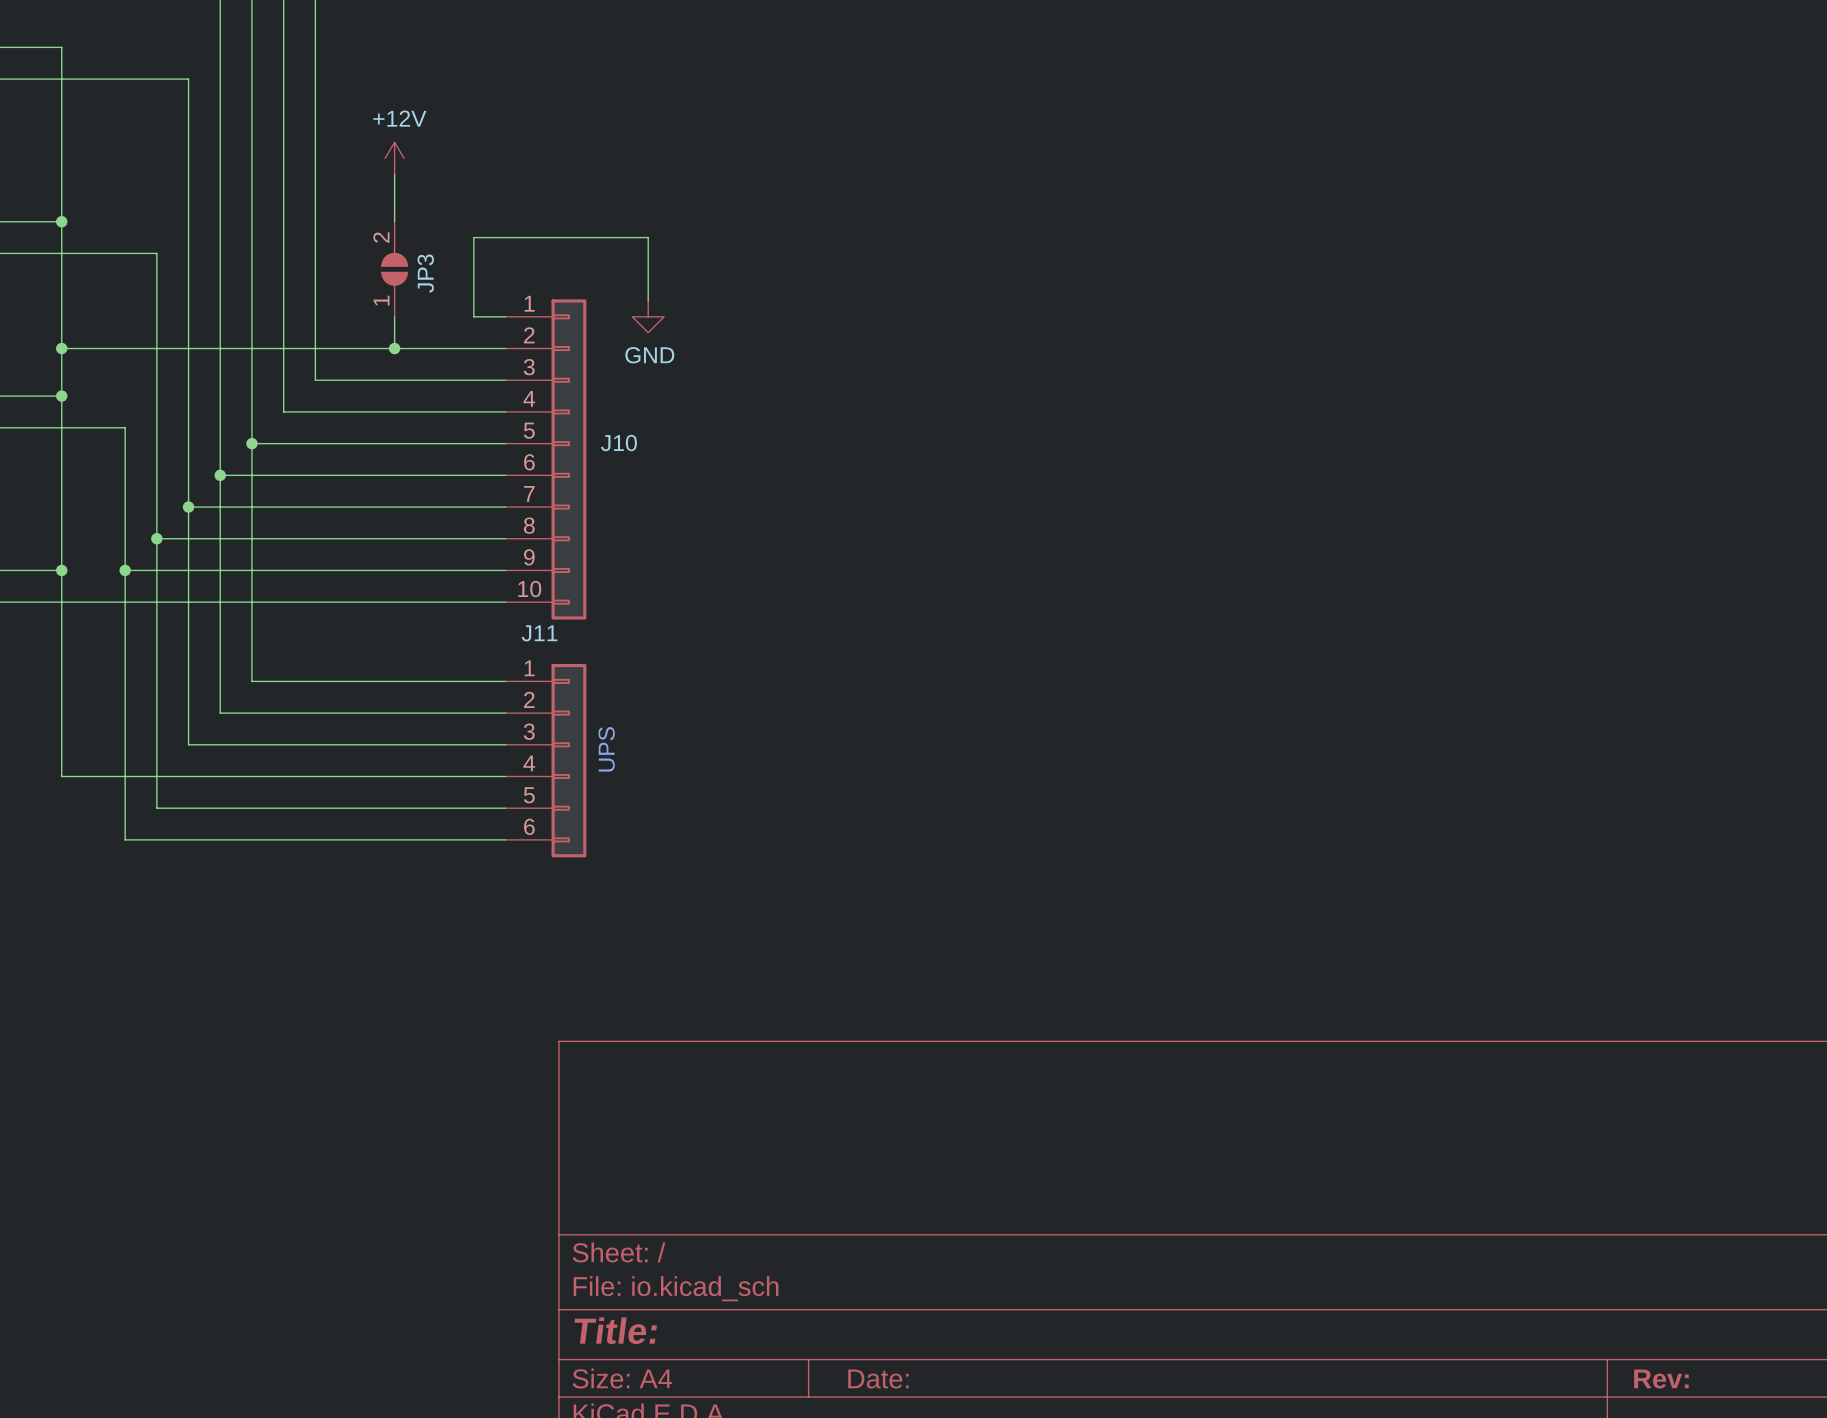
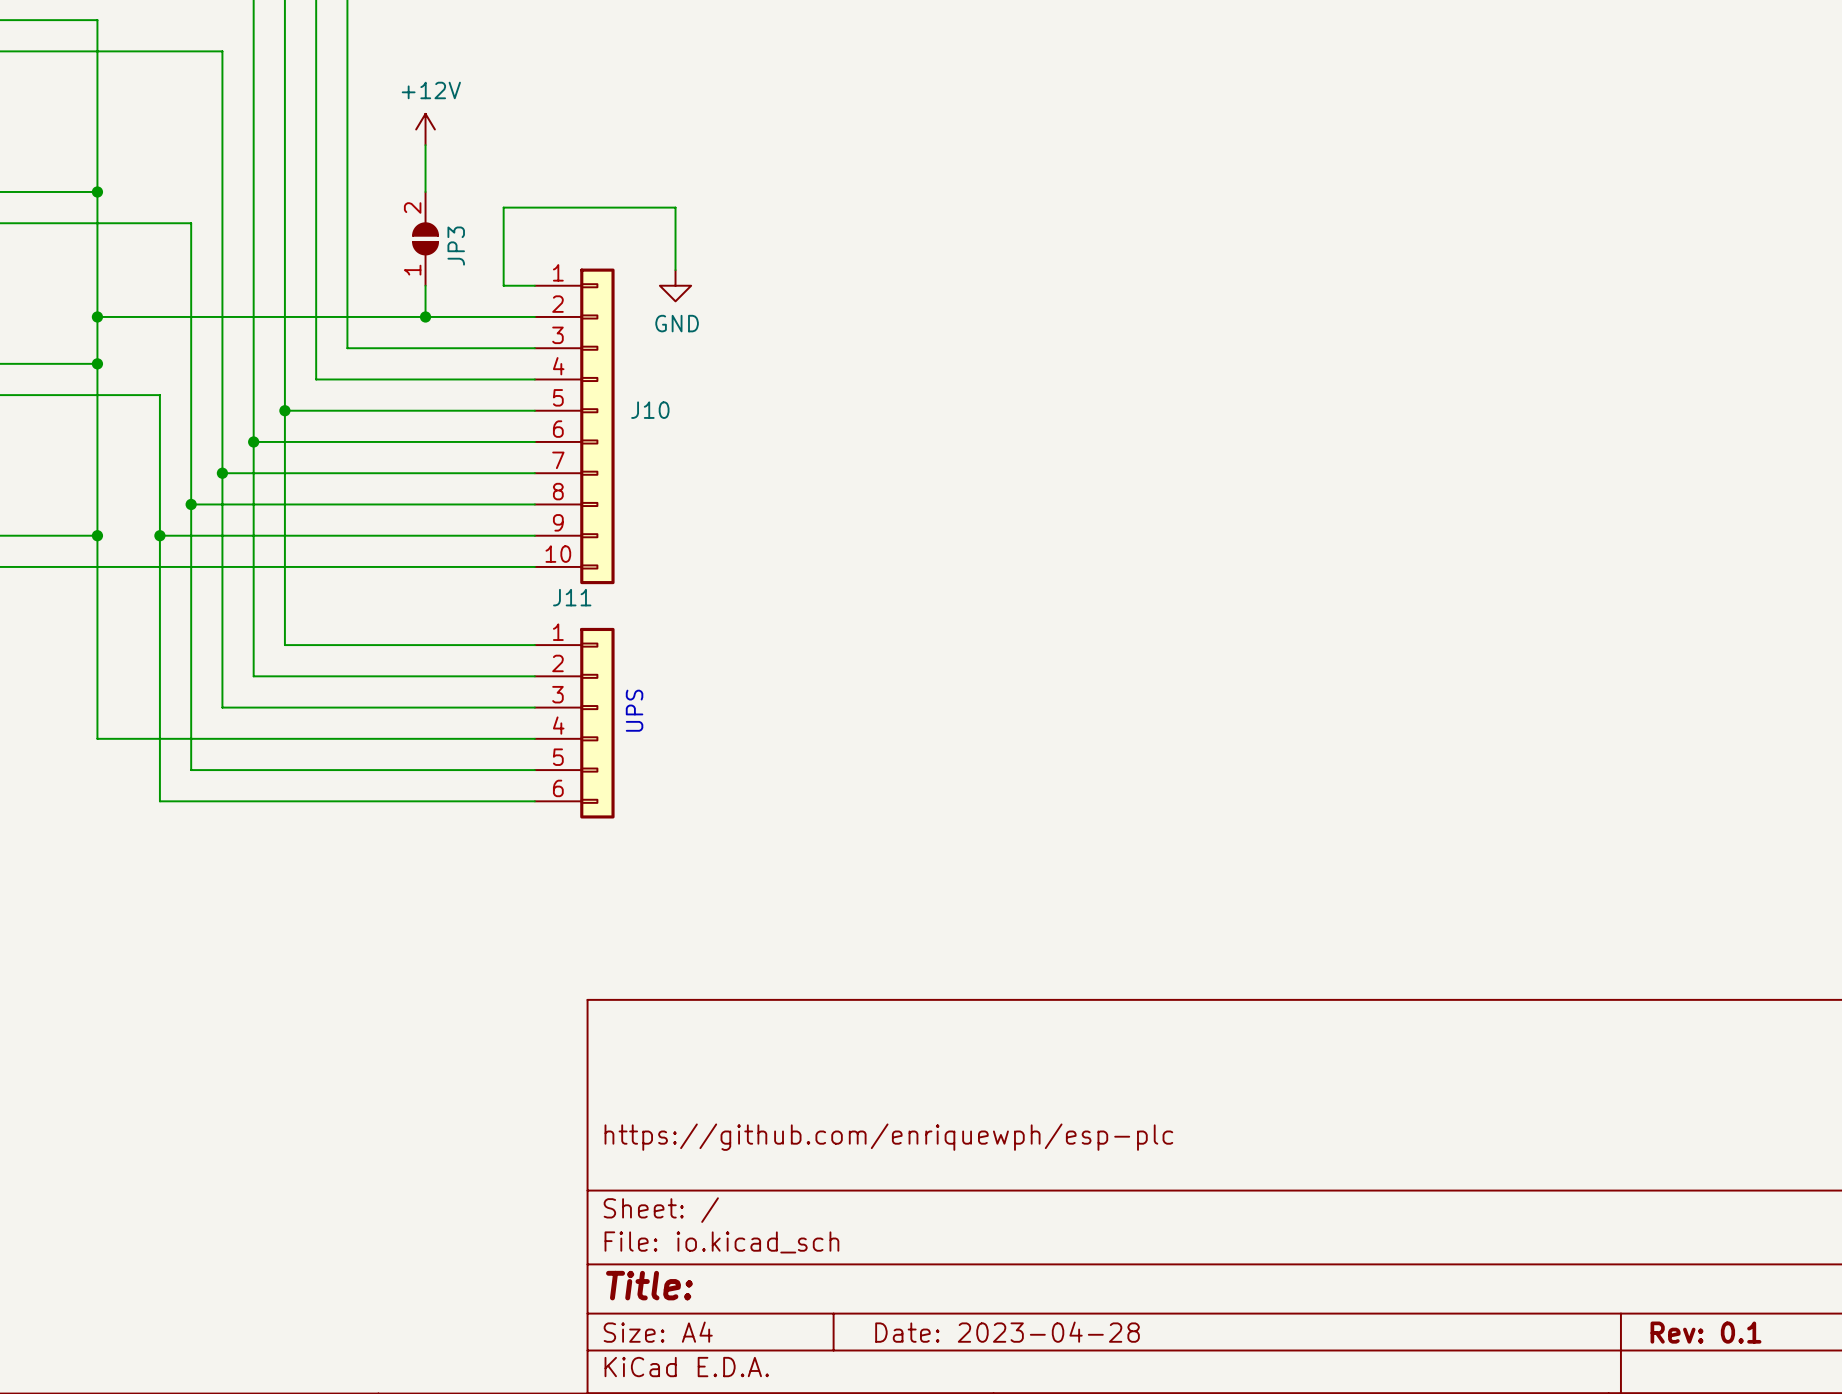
title block: none -> https://github.com/enriquewph/esp-plc (888, 1137)
title block: Date: (878, 1379) -> Date: 2023-04-28 (1007, 1332)
title block: Rev: (1661, 1379) -> Rev: 0.1 (1705, 1332)

